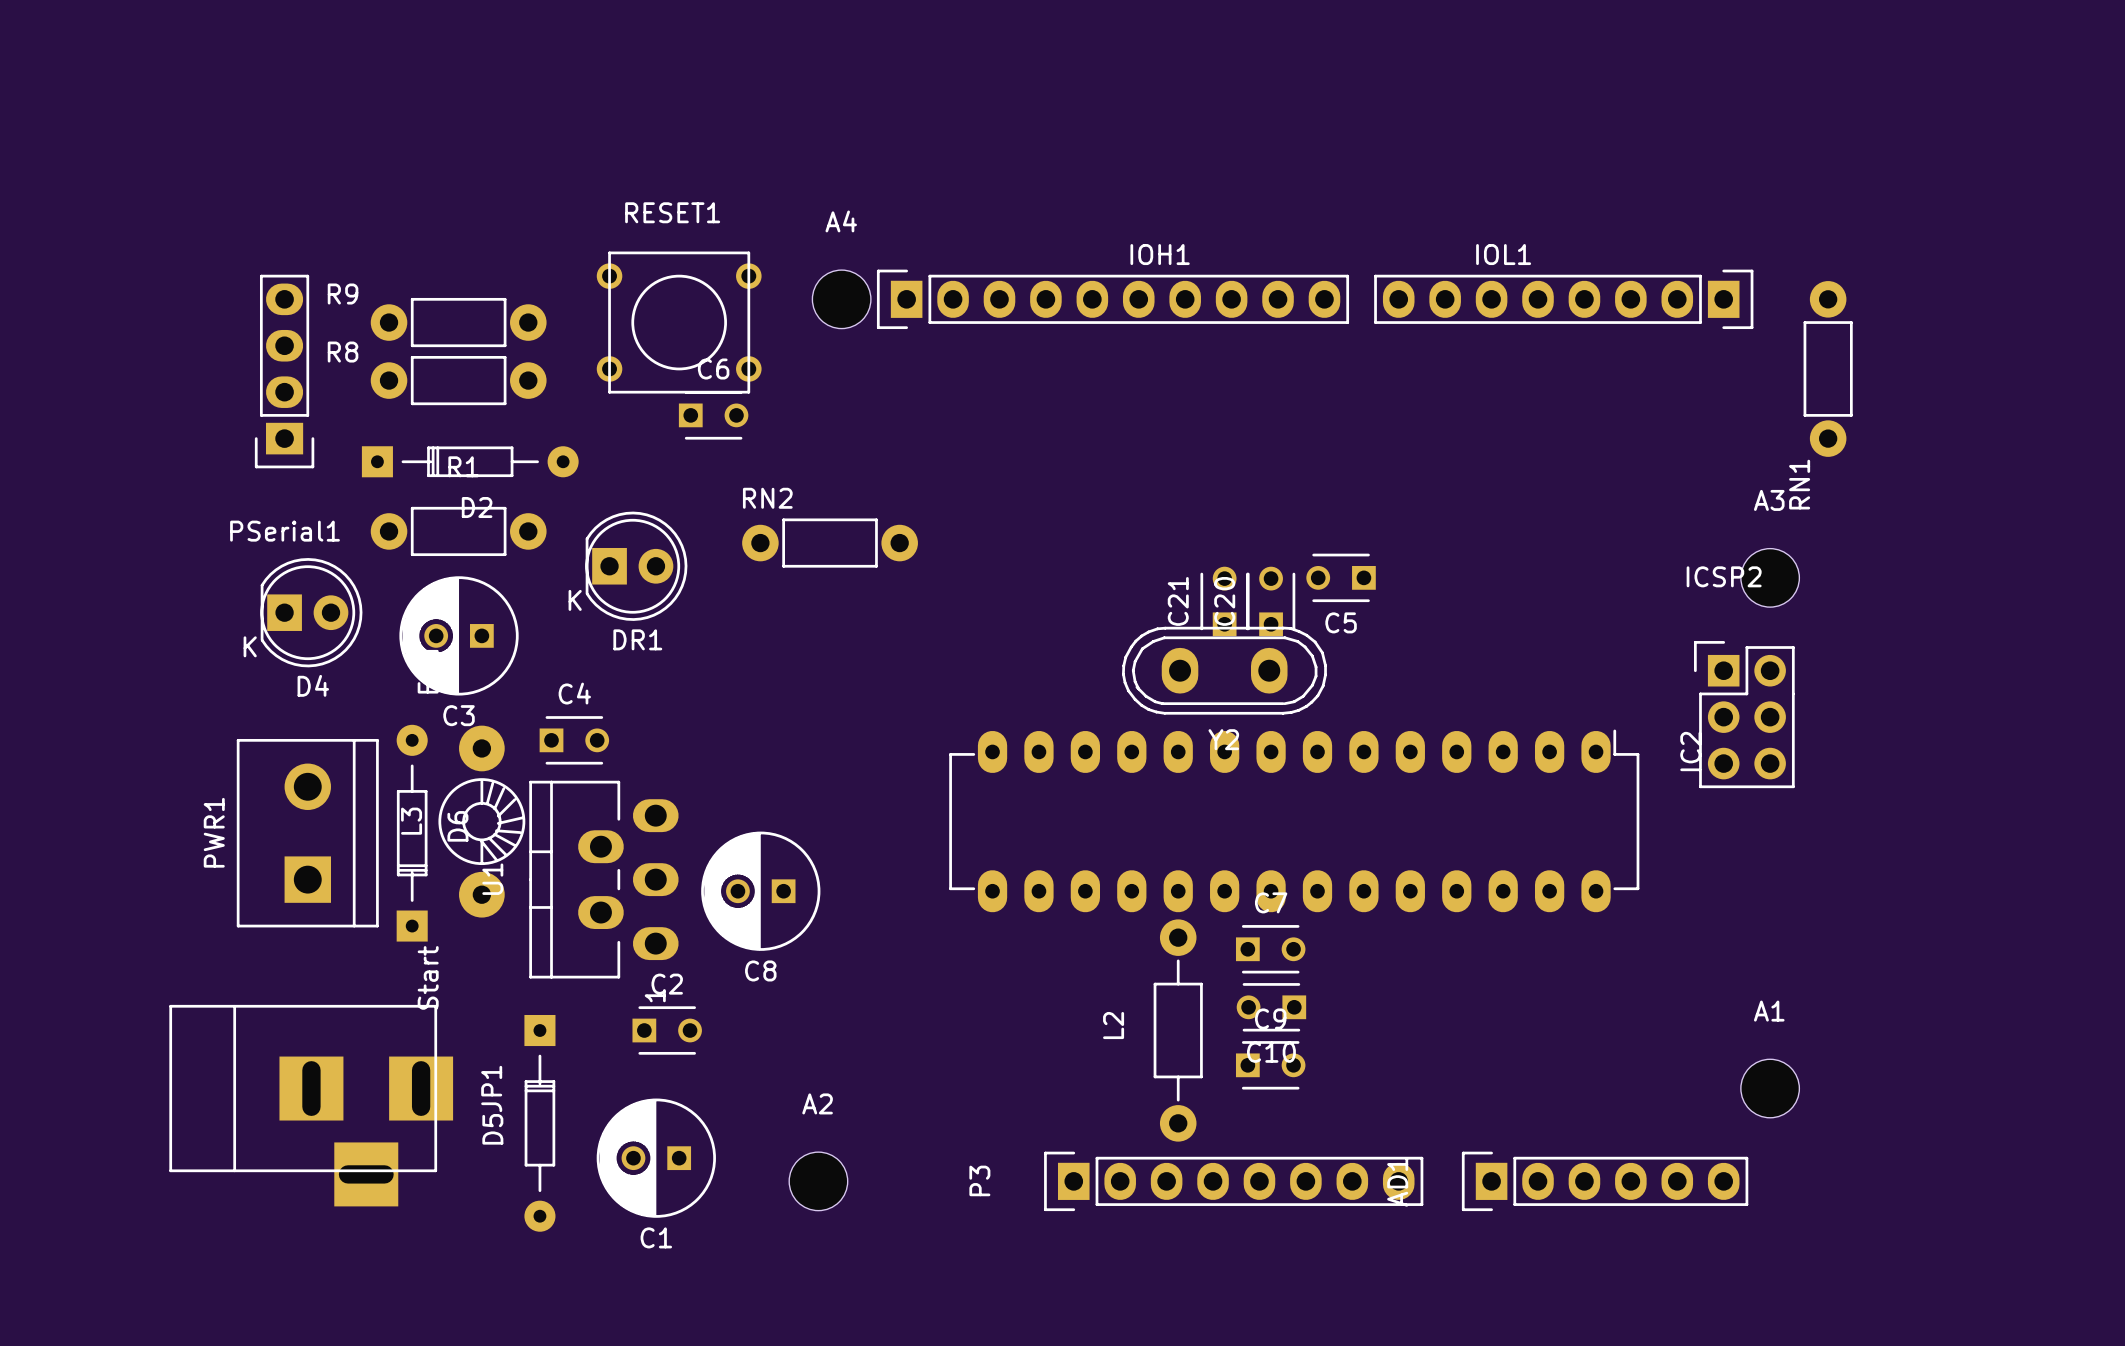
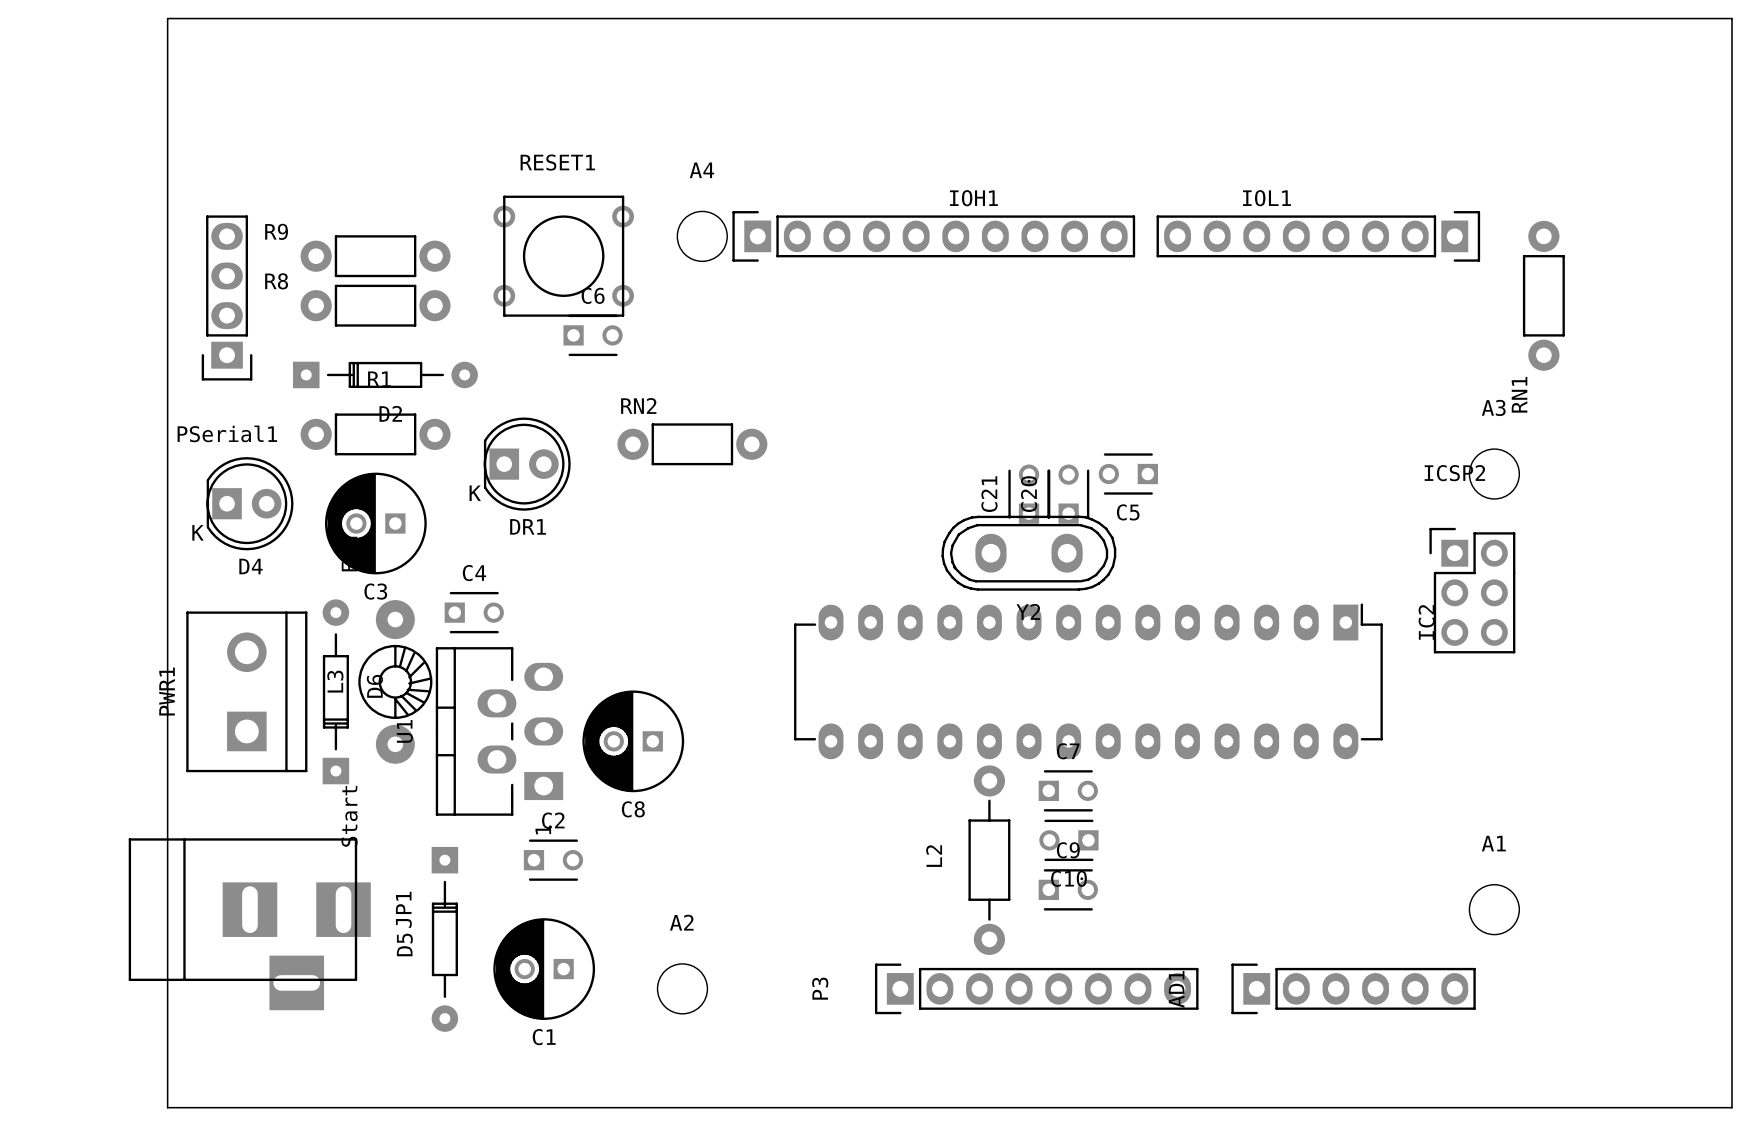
board edge: none -> (167, 18) (167, 1107) (1732, 1107) (1732, 18) (167, 18)
IC2 footprint: [949, 729, 1640, 913] -> [794, 603, 1383, 760]
U1 footprint: [529, 780, 679, 979] -> [435, 647, 564, 816]

